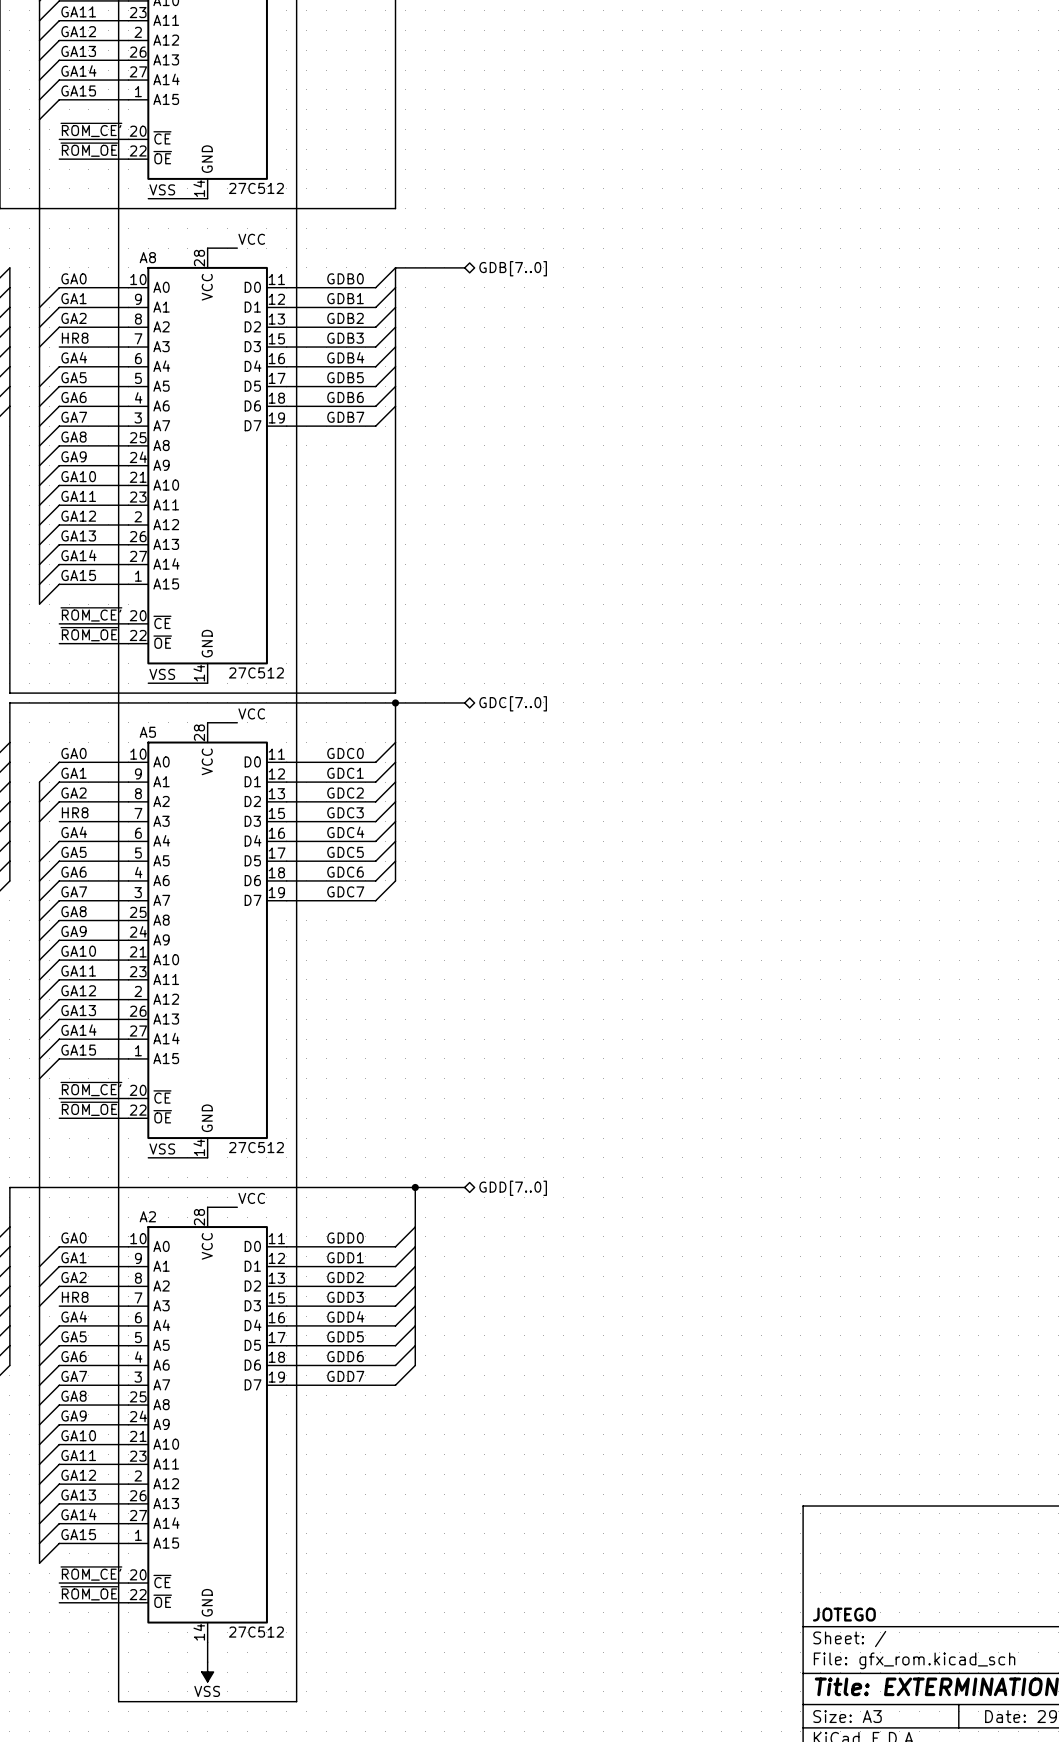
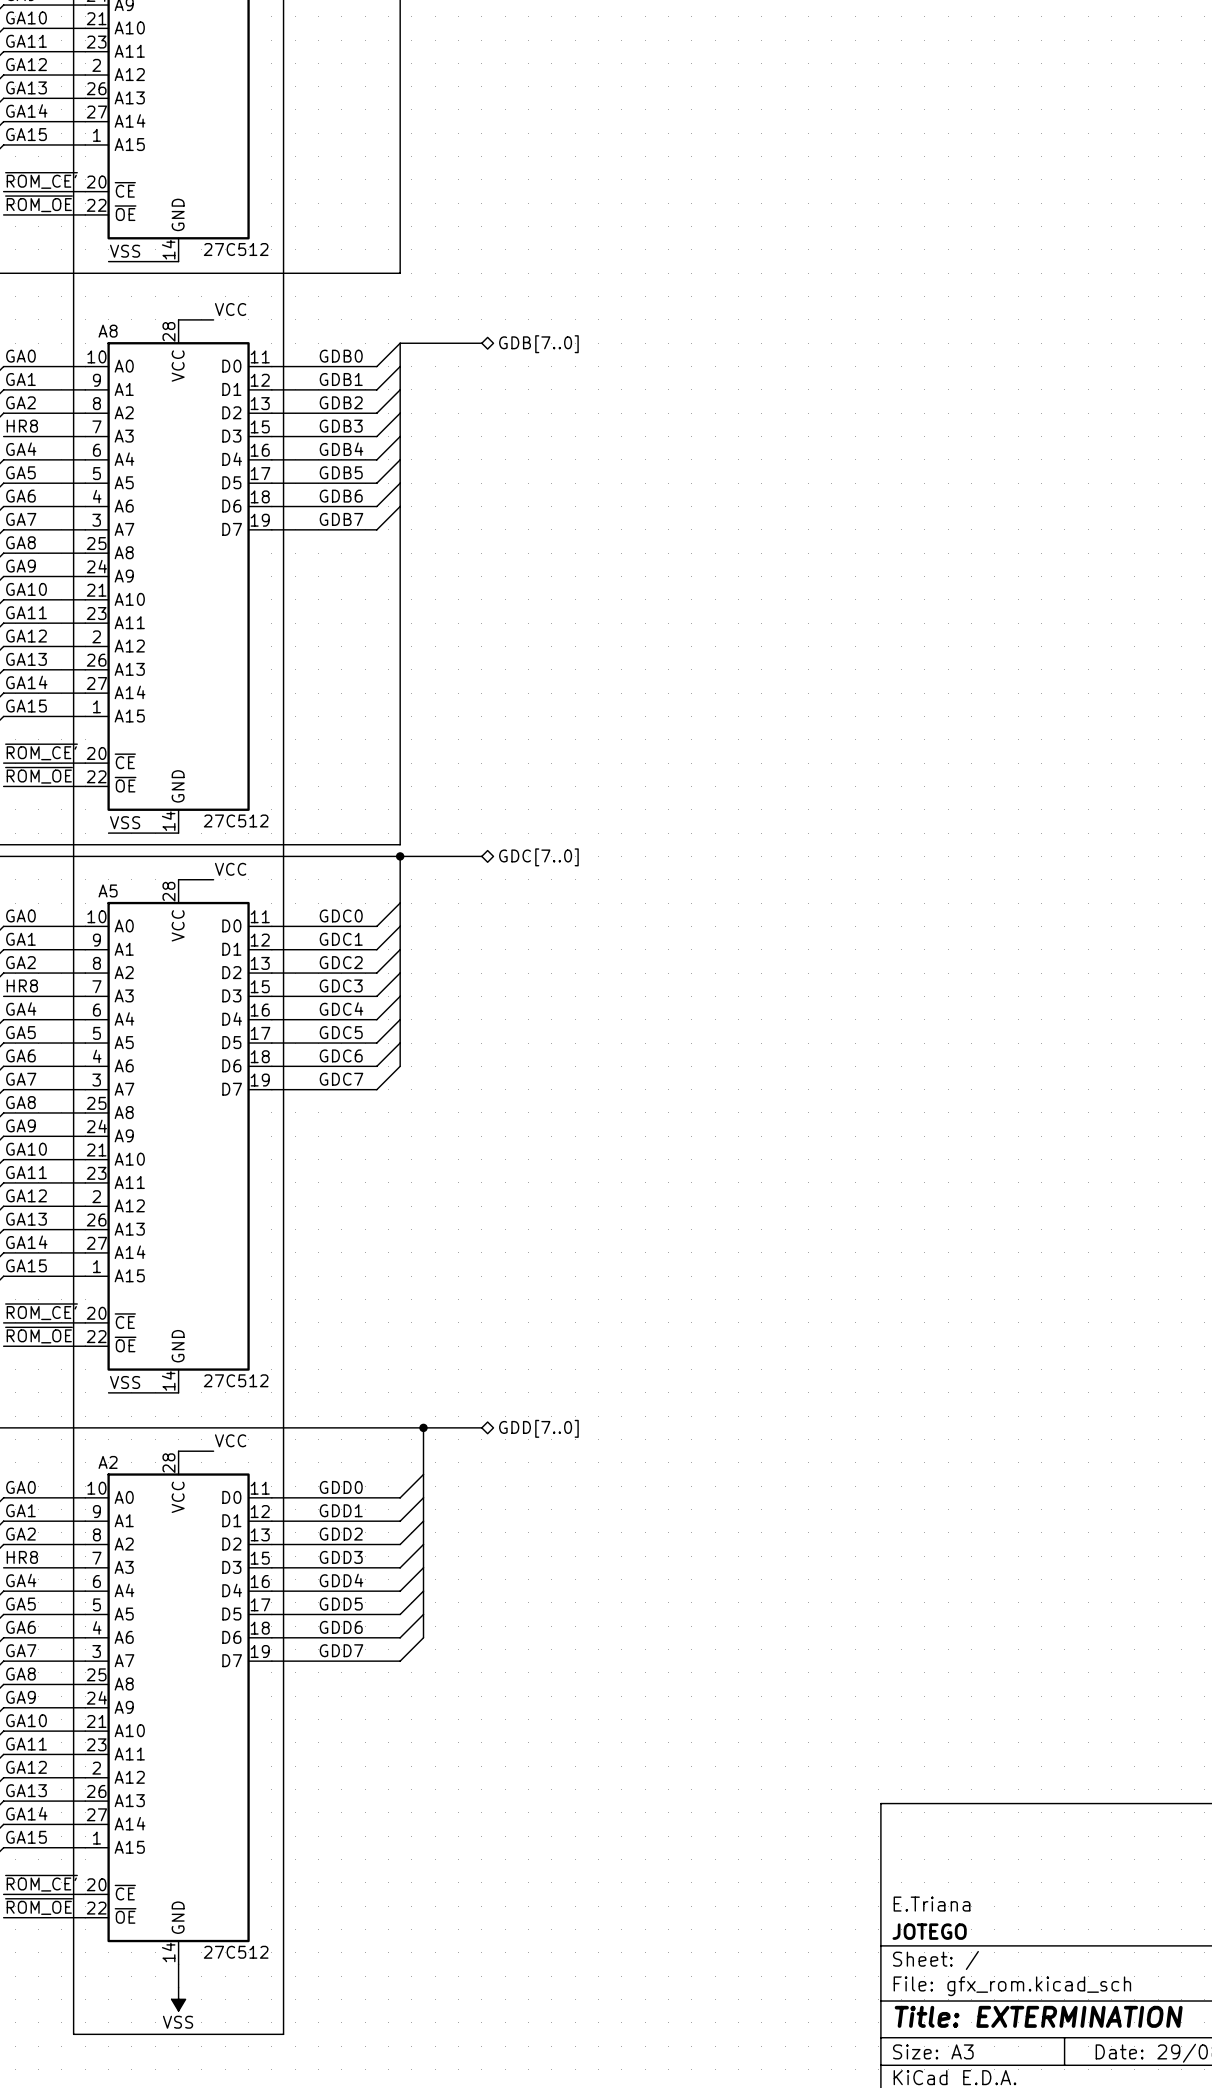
title block: none -> E.Triana (932, 1904)

